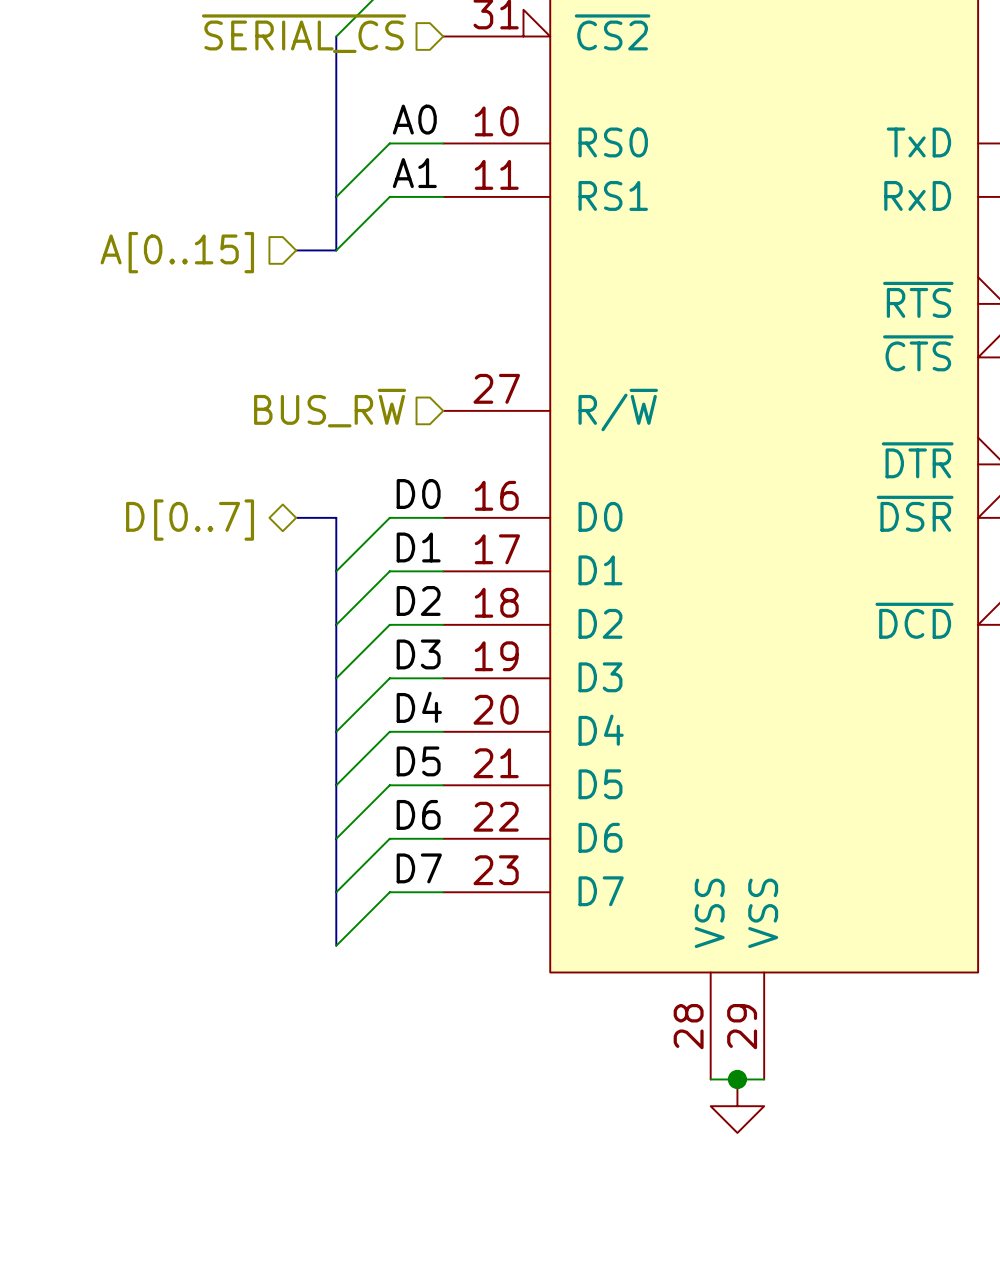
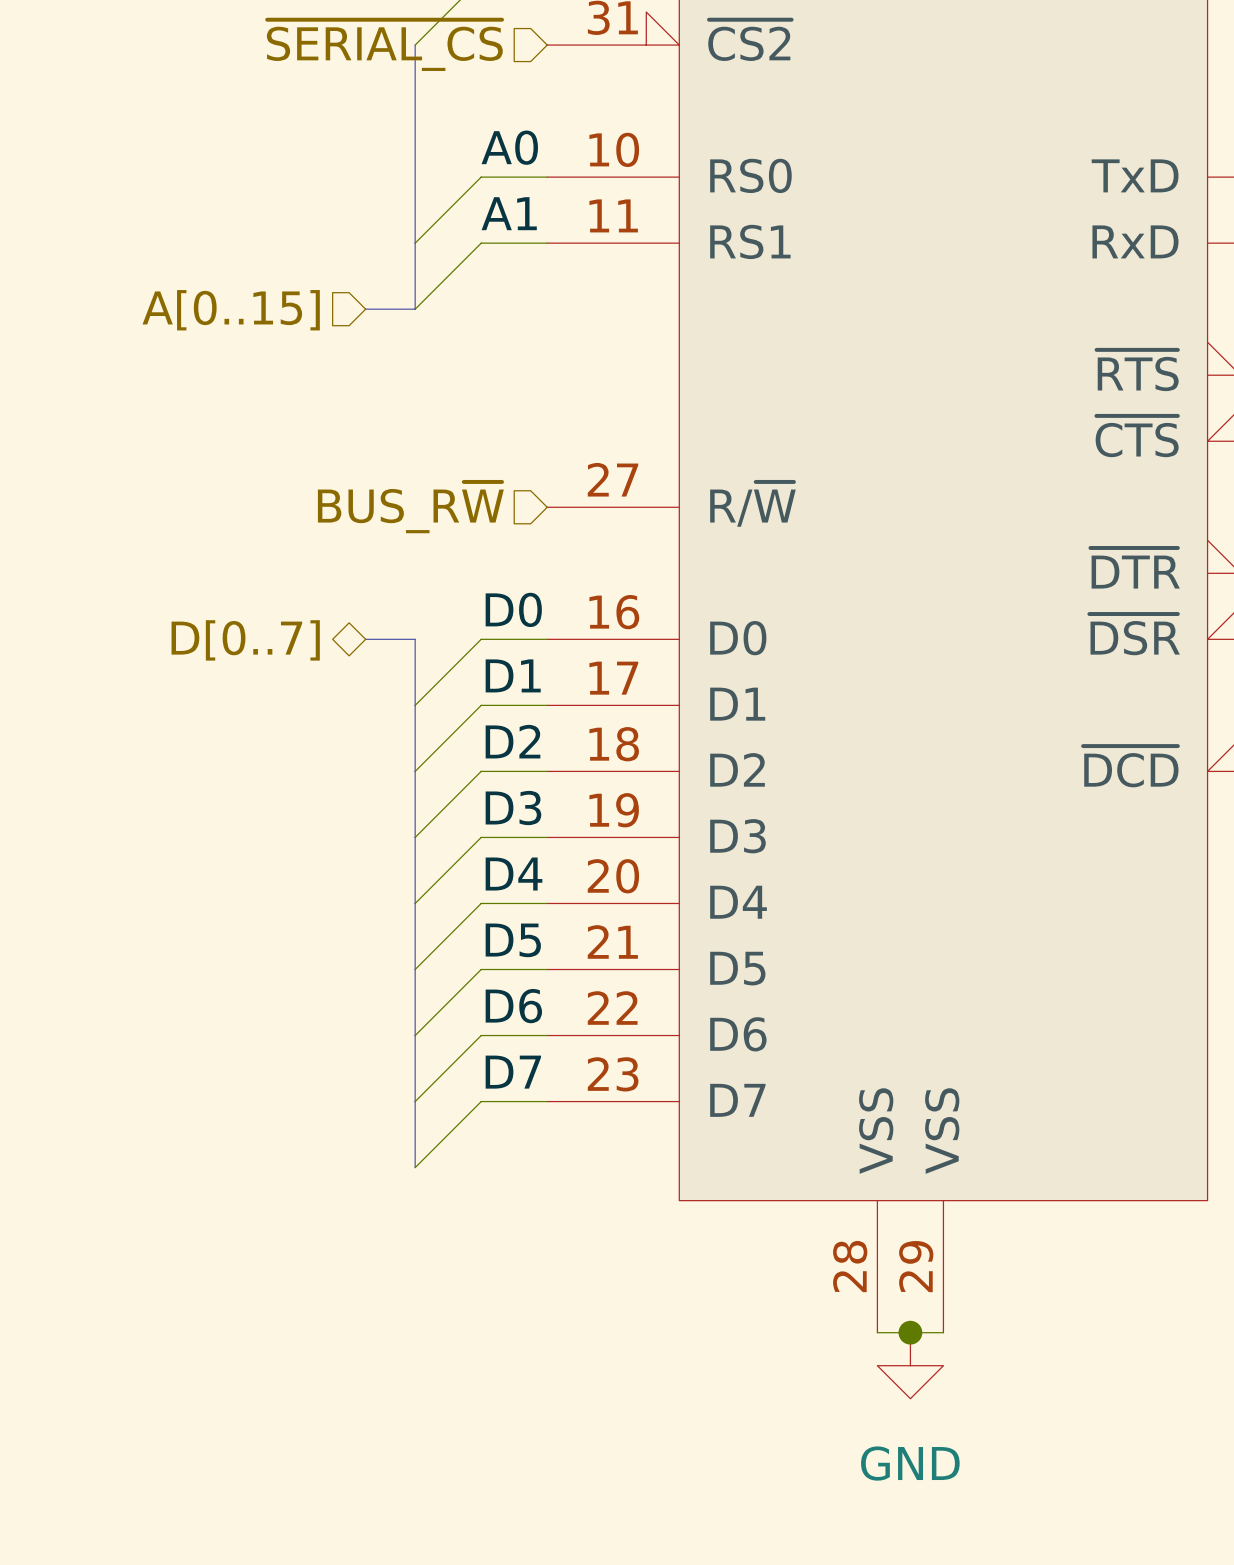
power symbol text: none -> GND (910, 1463)

